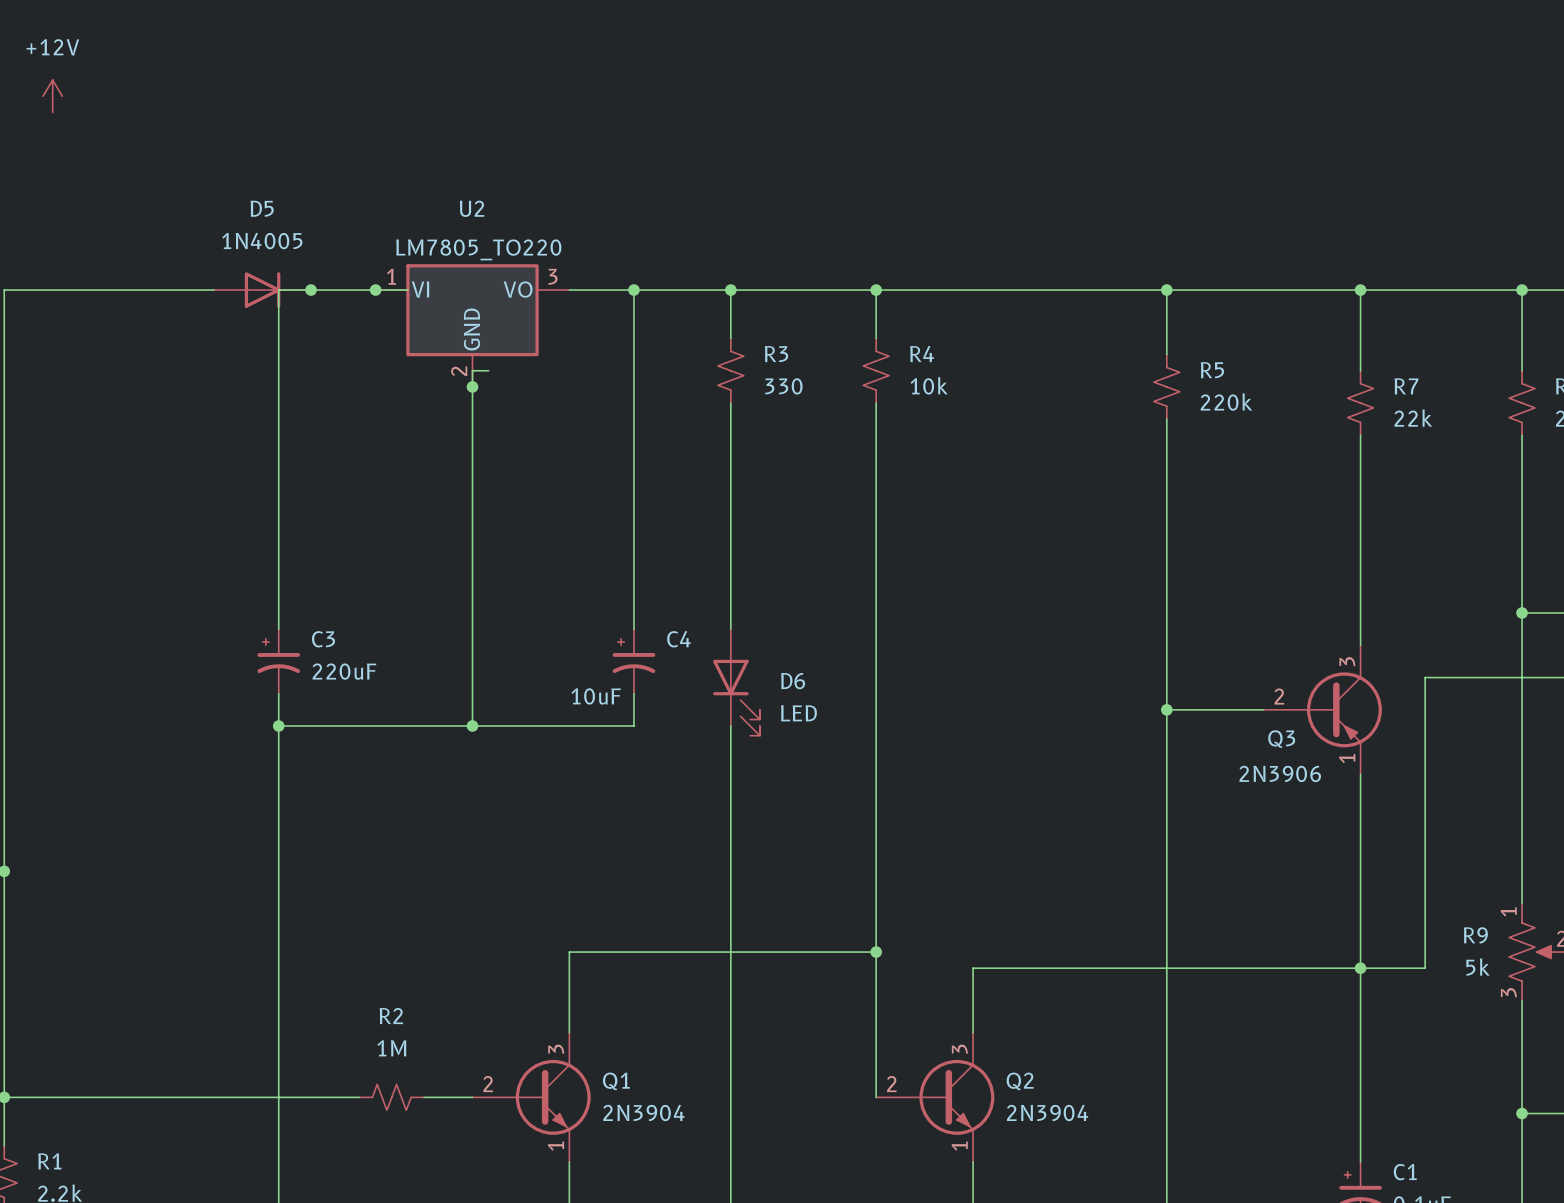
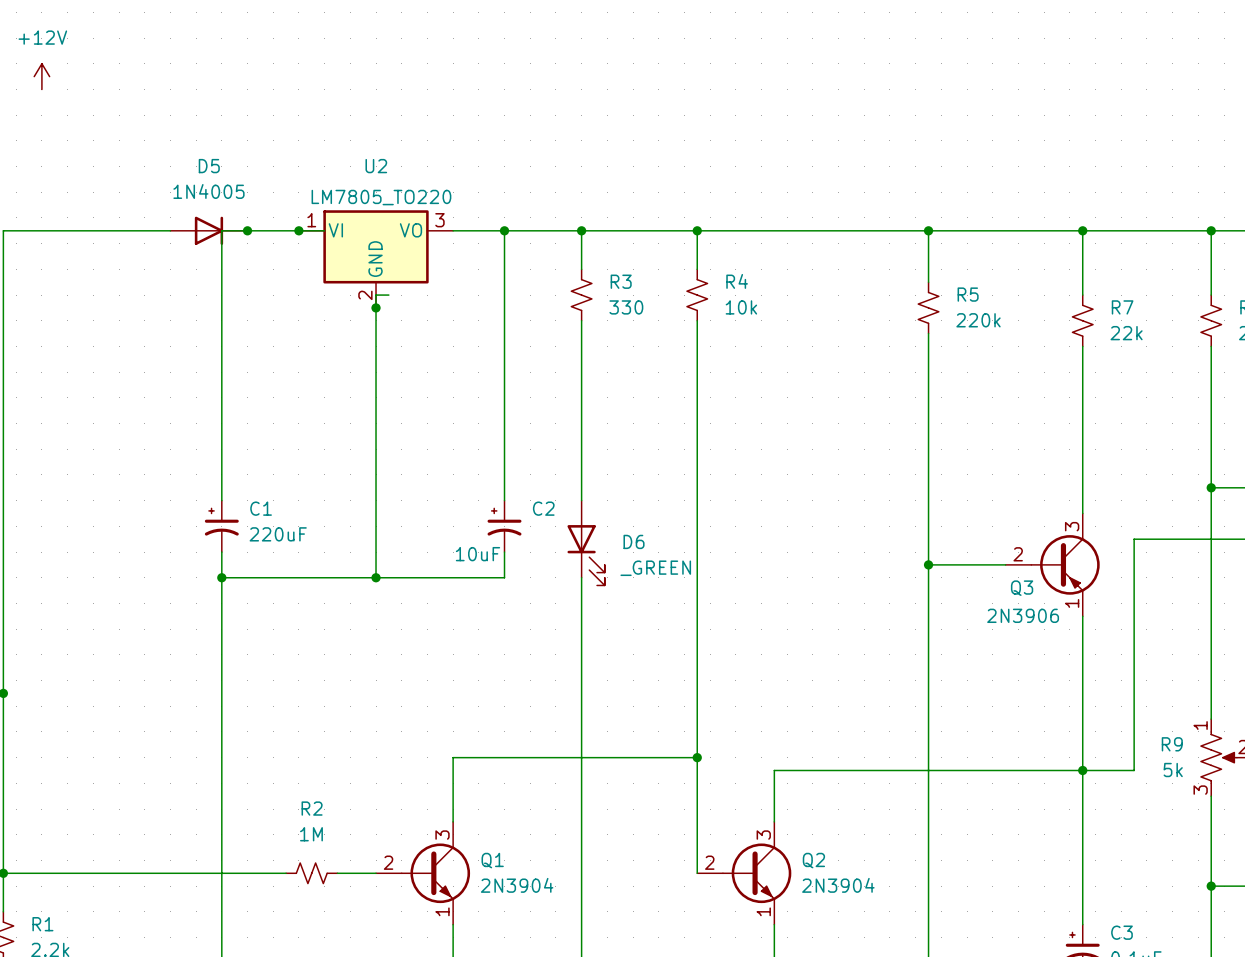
C3 name: C3 (323, 639) -> C1 (261, 508)
C4 name: C4 (678, 639) -> C2 (543, 508)
D6 value: LED (798, 713) -> _GREEN (655, 568)
C1 name: C1 (1405, 1172) -> C3 (1121, 932)

